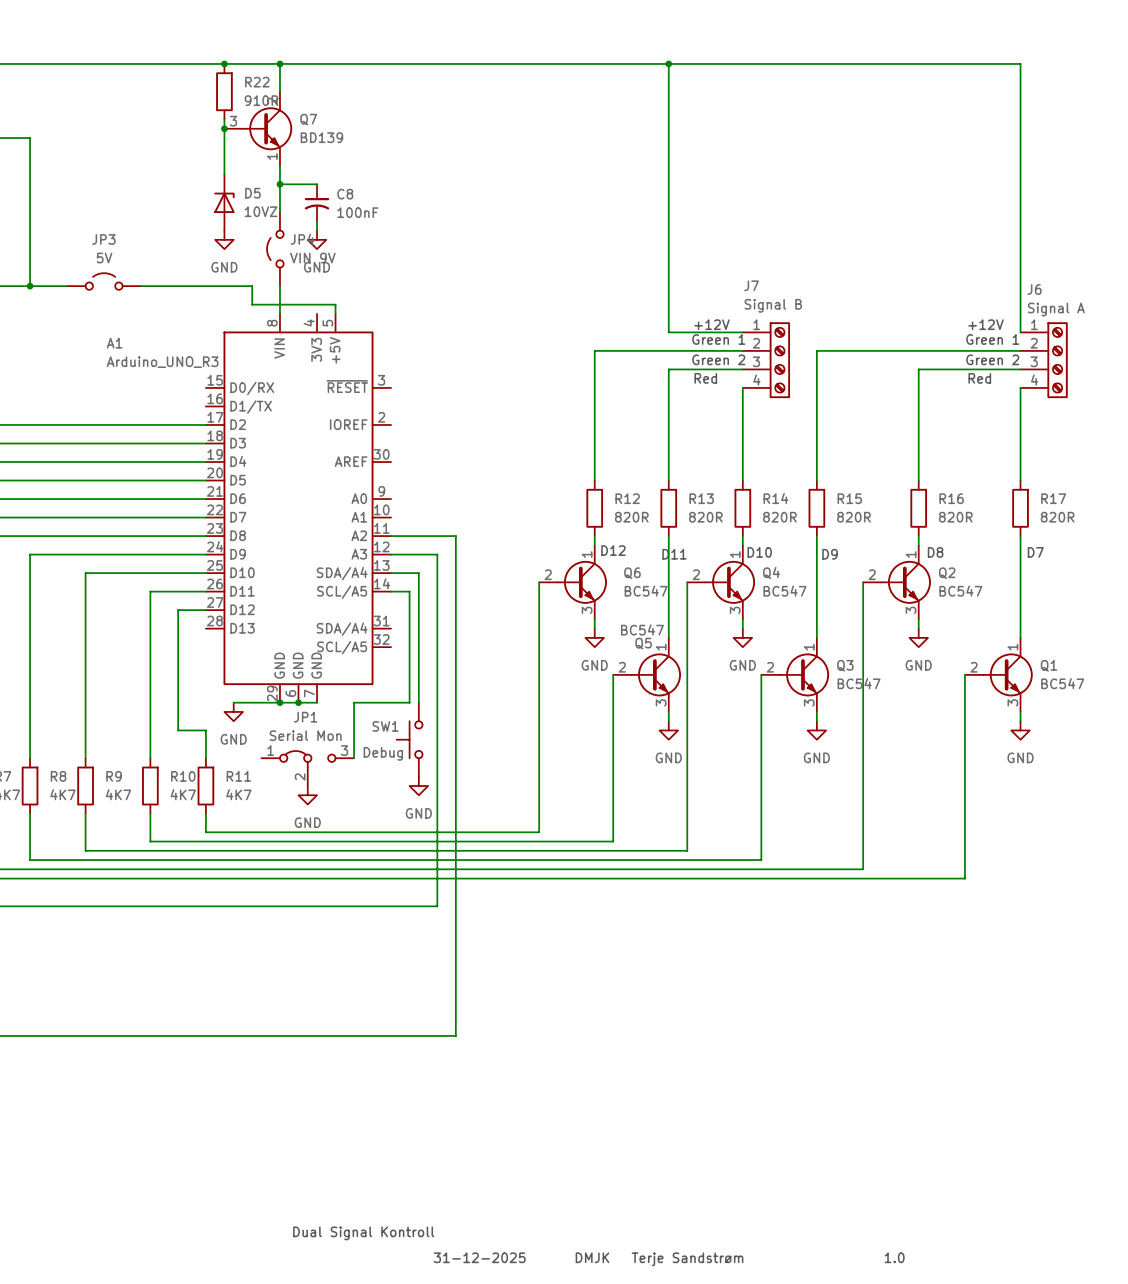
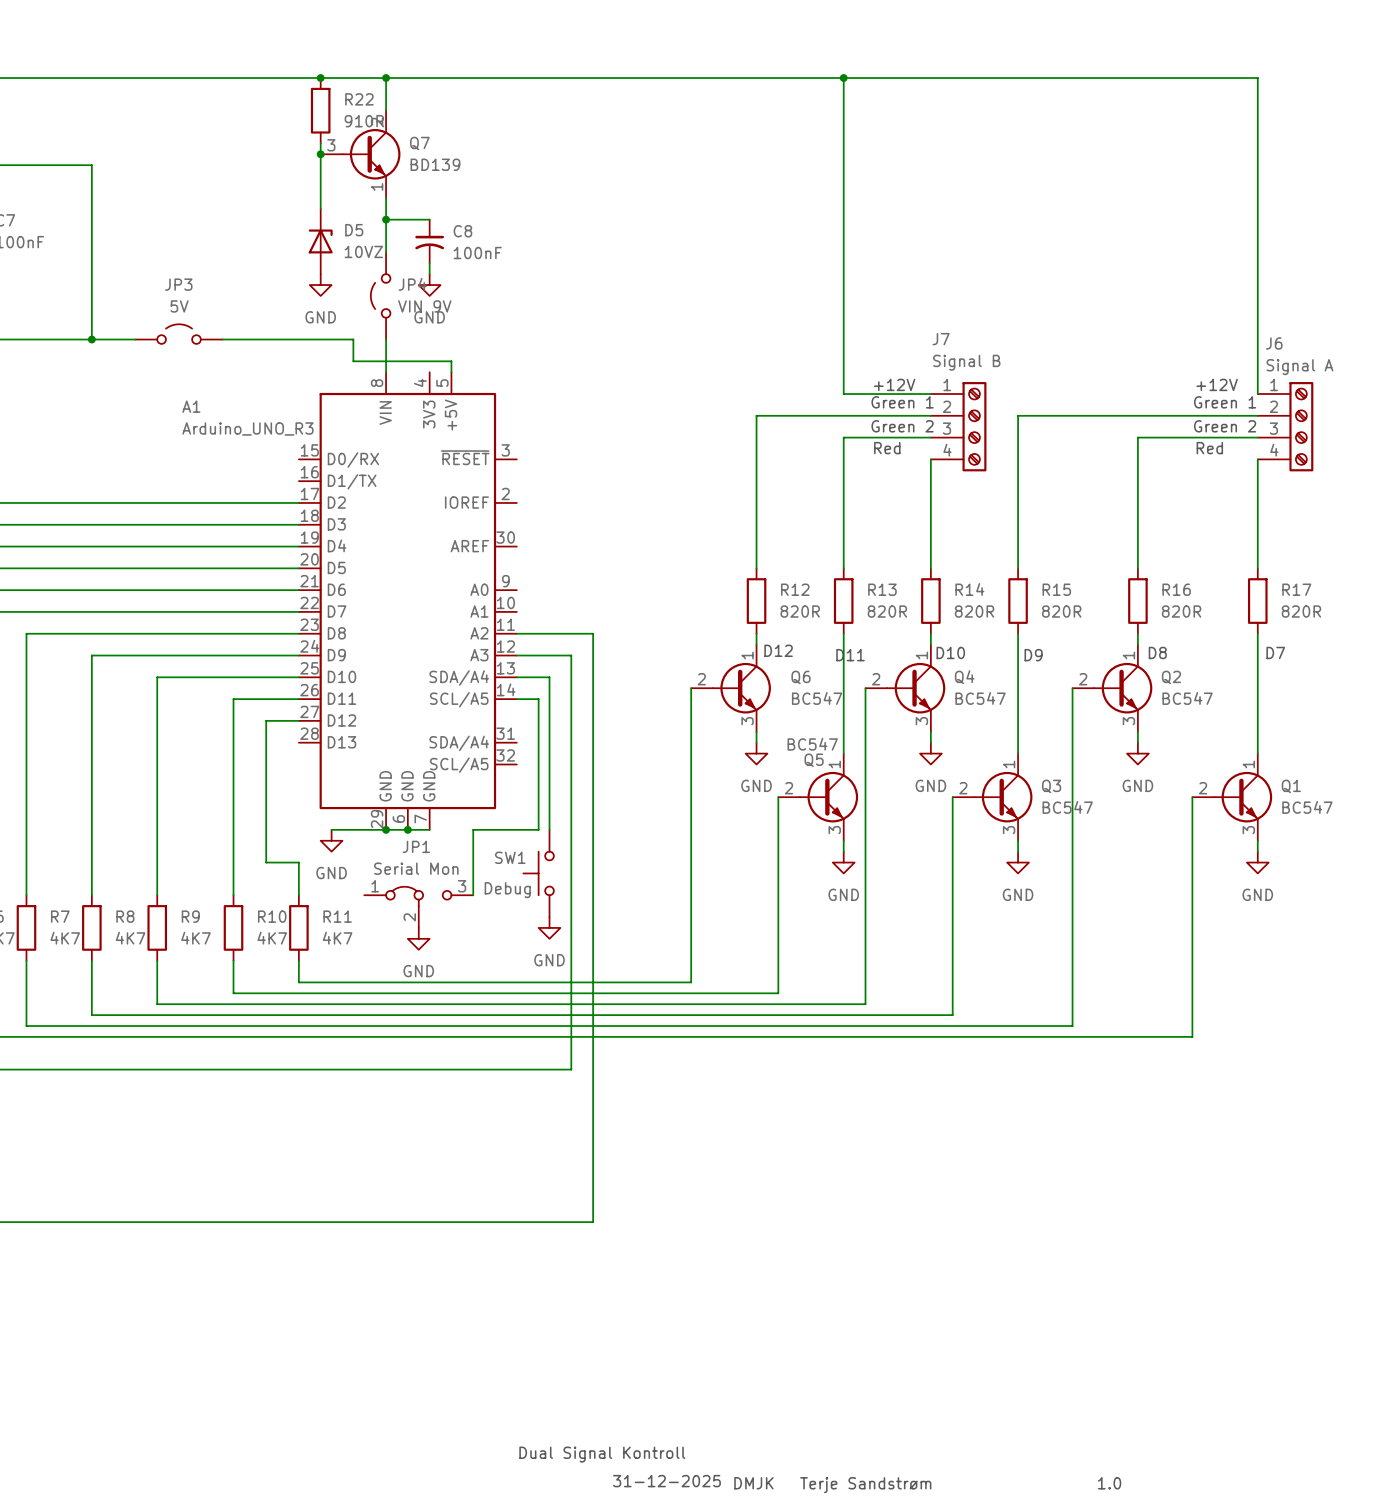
text position: Dual Signal Kontroll (363, 1233) -> Dual Signal Kontroll (602, 1454)
text position: 31-12-2025 (479, 1257) -> 31-12-2025 (666, 1481)

